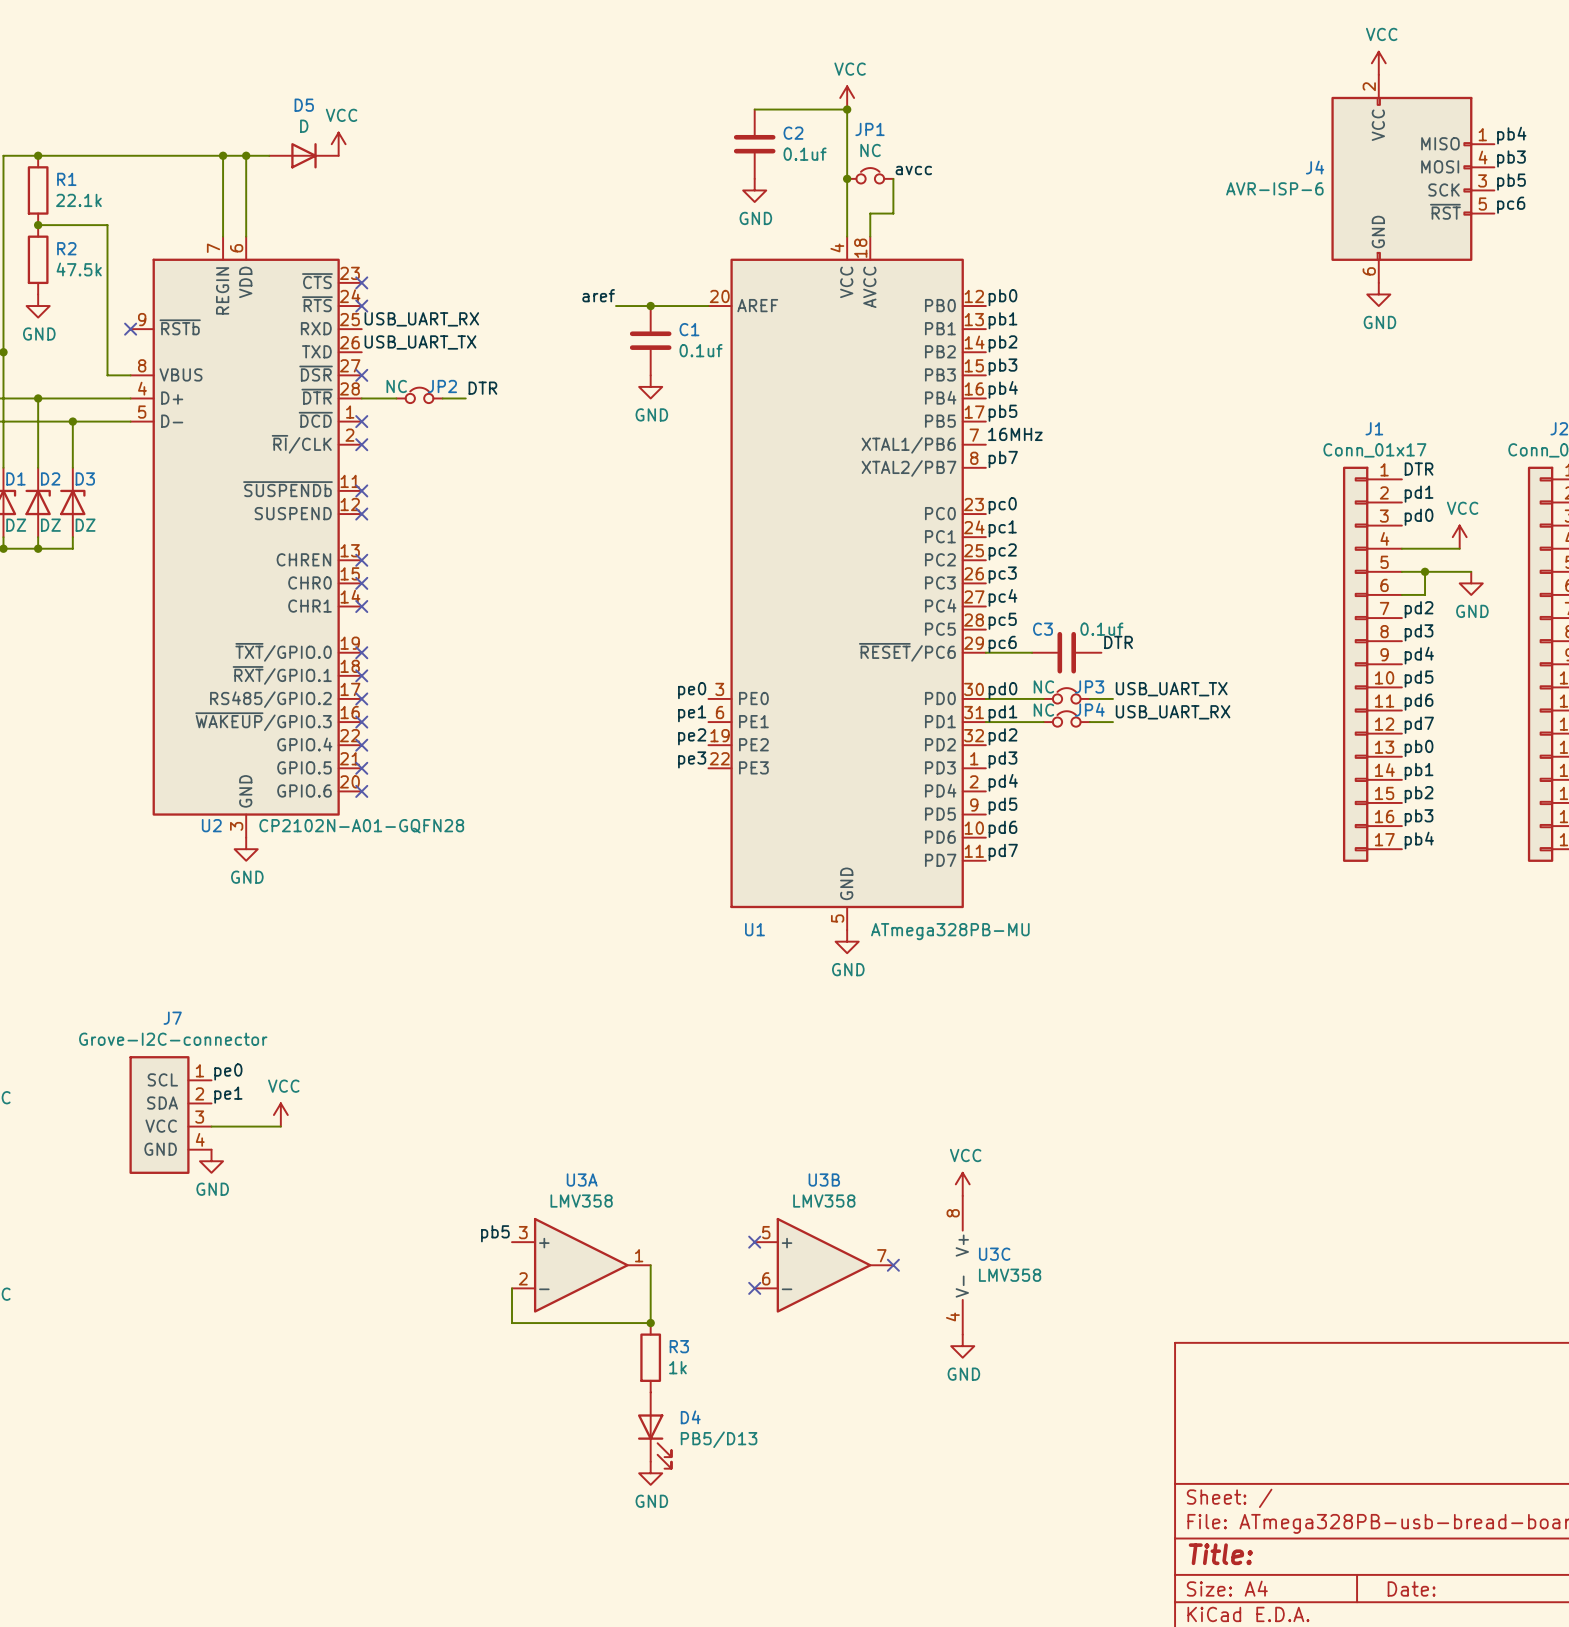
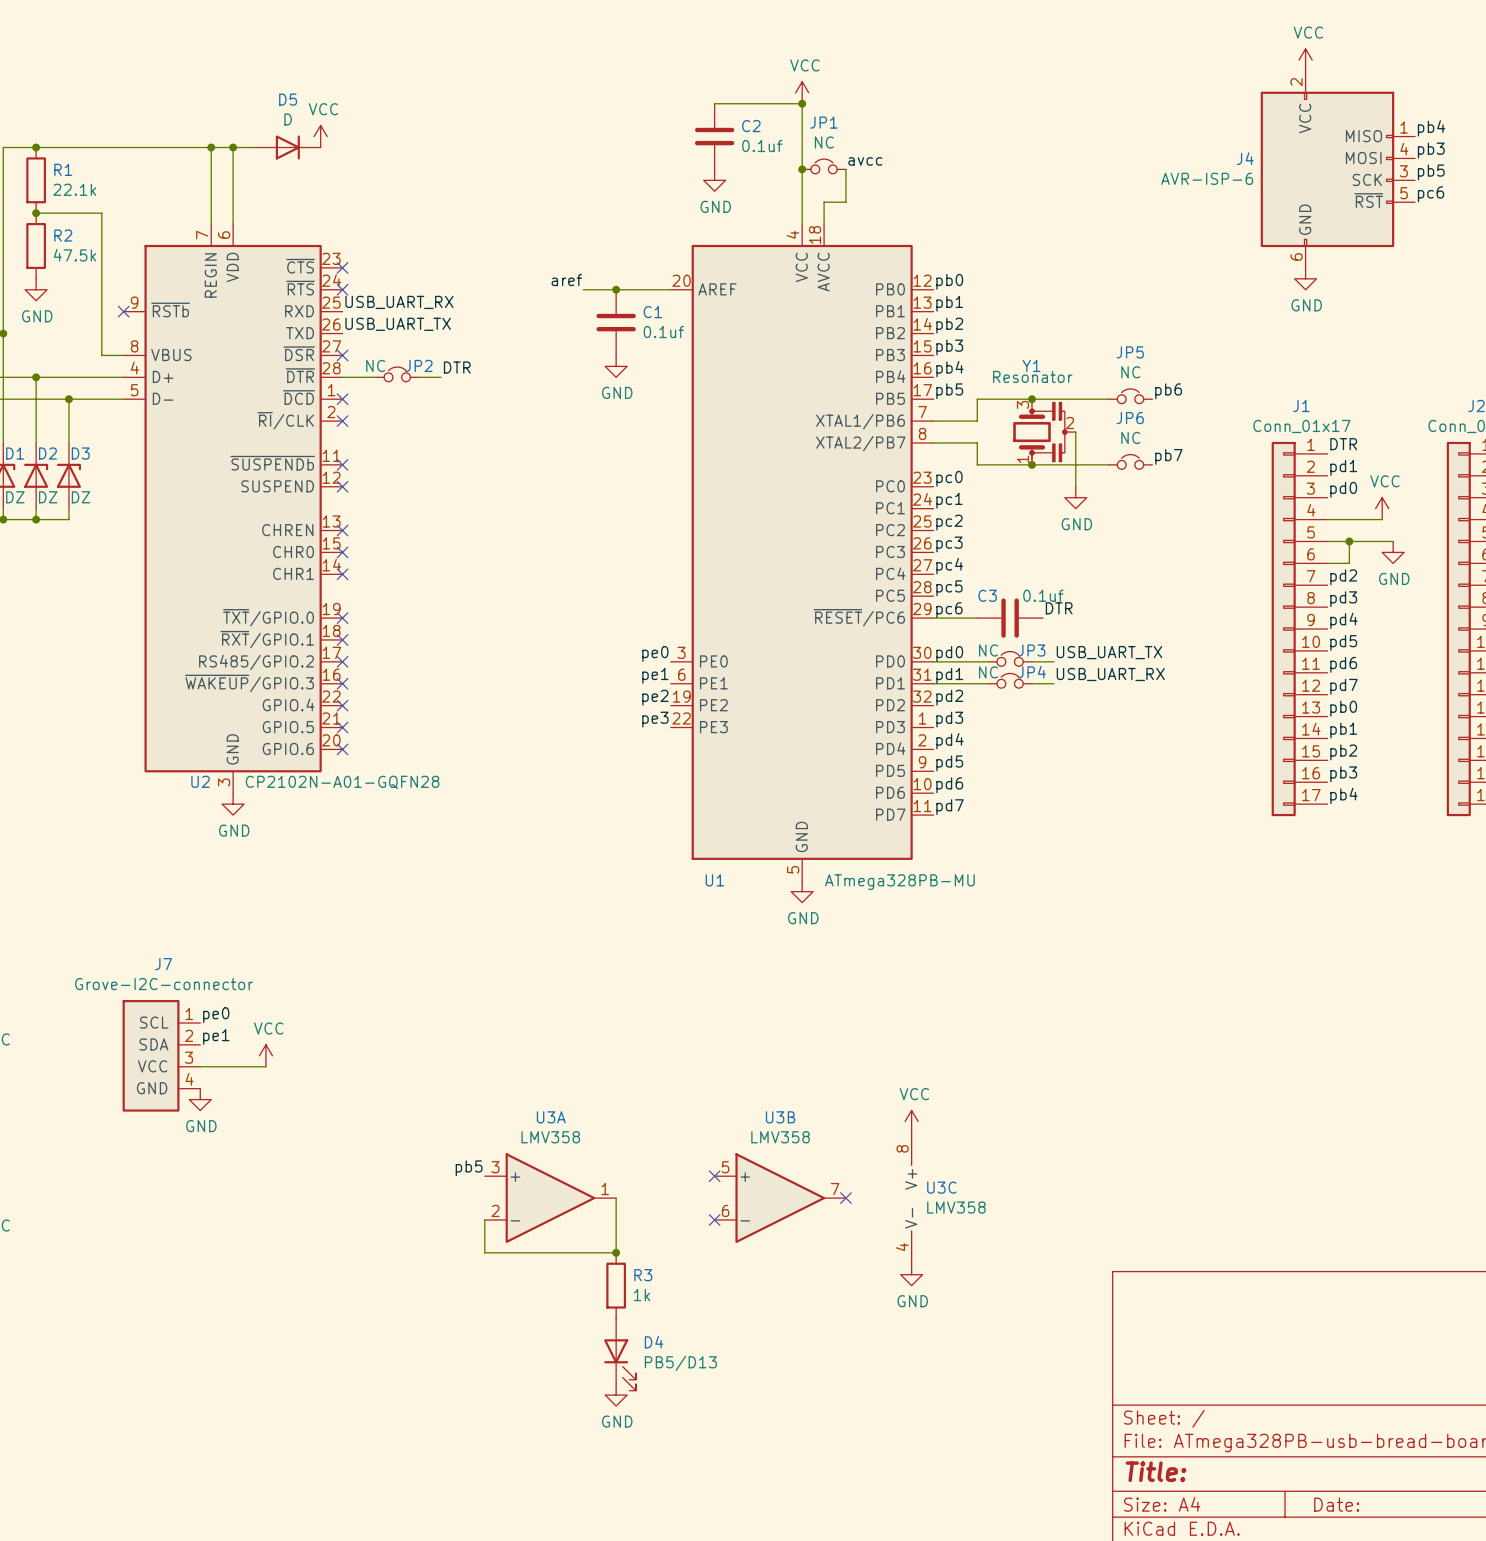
label: none -> pb6 (1168, 391)
JP5: none -> NC (1130, 396)
junction: none -> (1032, 399)
wire: none -> (1108, 399) (977, 399) (977, 421) (933, 421)
label: 16MHz (1015, 434) -> none
Y1: none -> Resonator (1044, 432)
wire: none -> (1075, 432) (1075, 486)
label: pb7 (1003, 459) -> none
wire: none -> (933, 442) (977, 442) (977, 464) (1108, 464)
label: none -> pb7 (1168, 456)
JP6: none -> NC (1130, 461)
junction: none -> (1032, 464)
power symbol: none -> GND (1075, 497)

